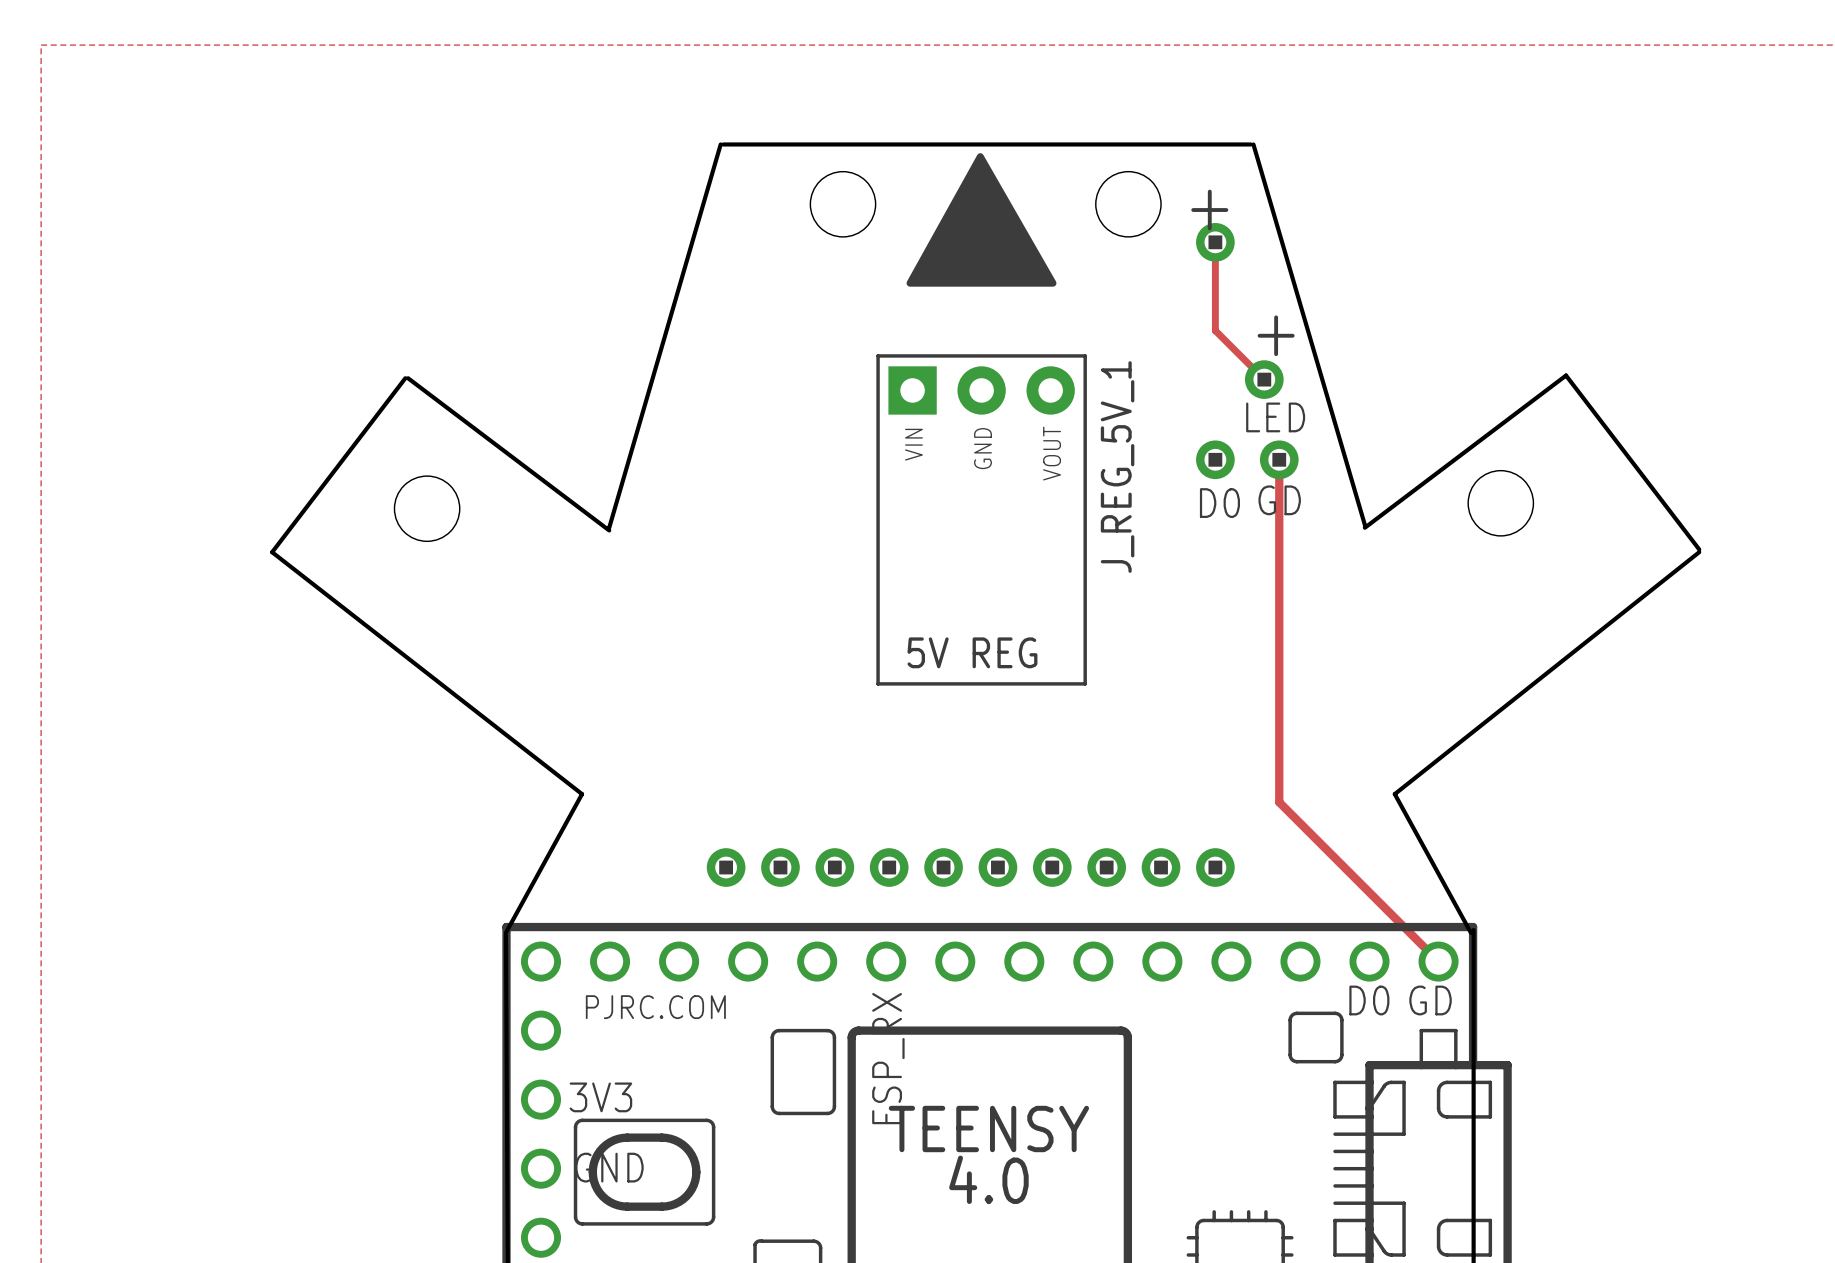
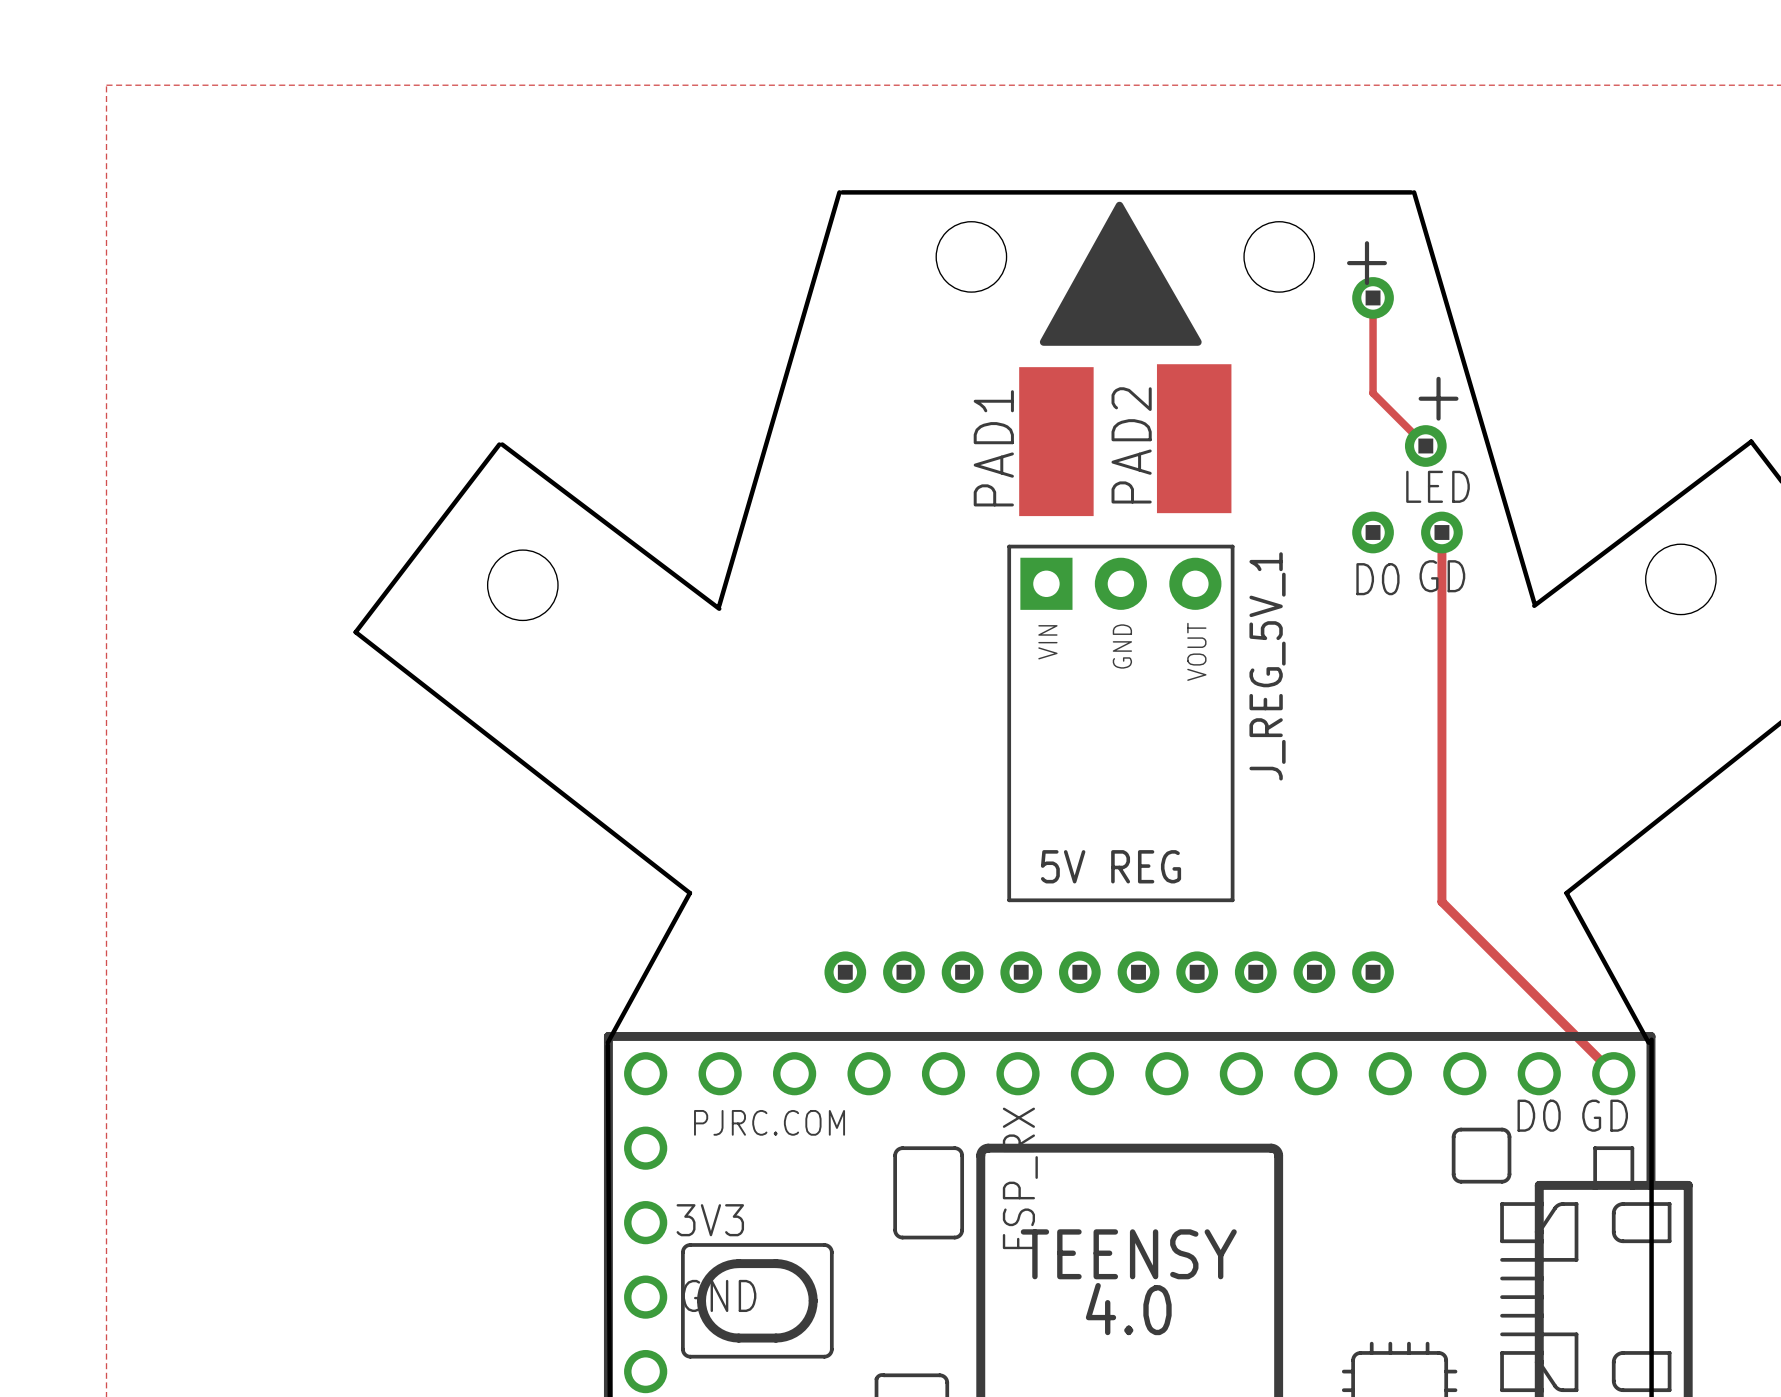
PAD2: none -> (1194, 438)
PAD1: none -> (1056, 441)
J_REG_5V_1 position: (981, 519) -> (1120, 723)

